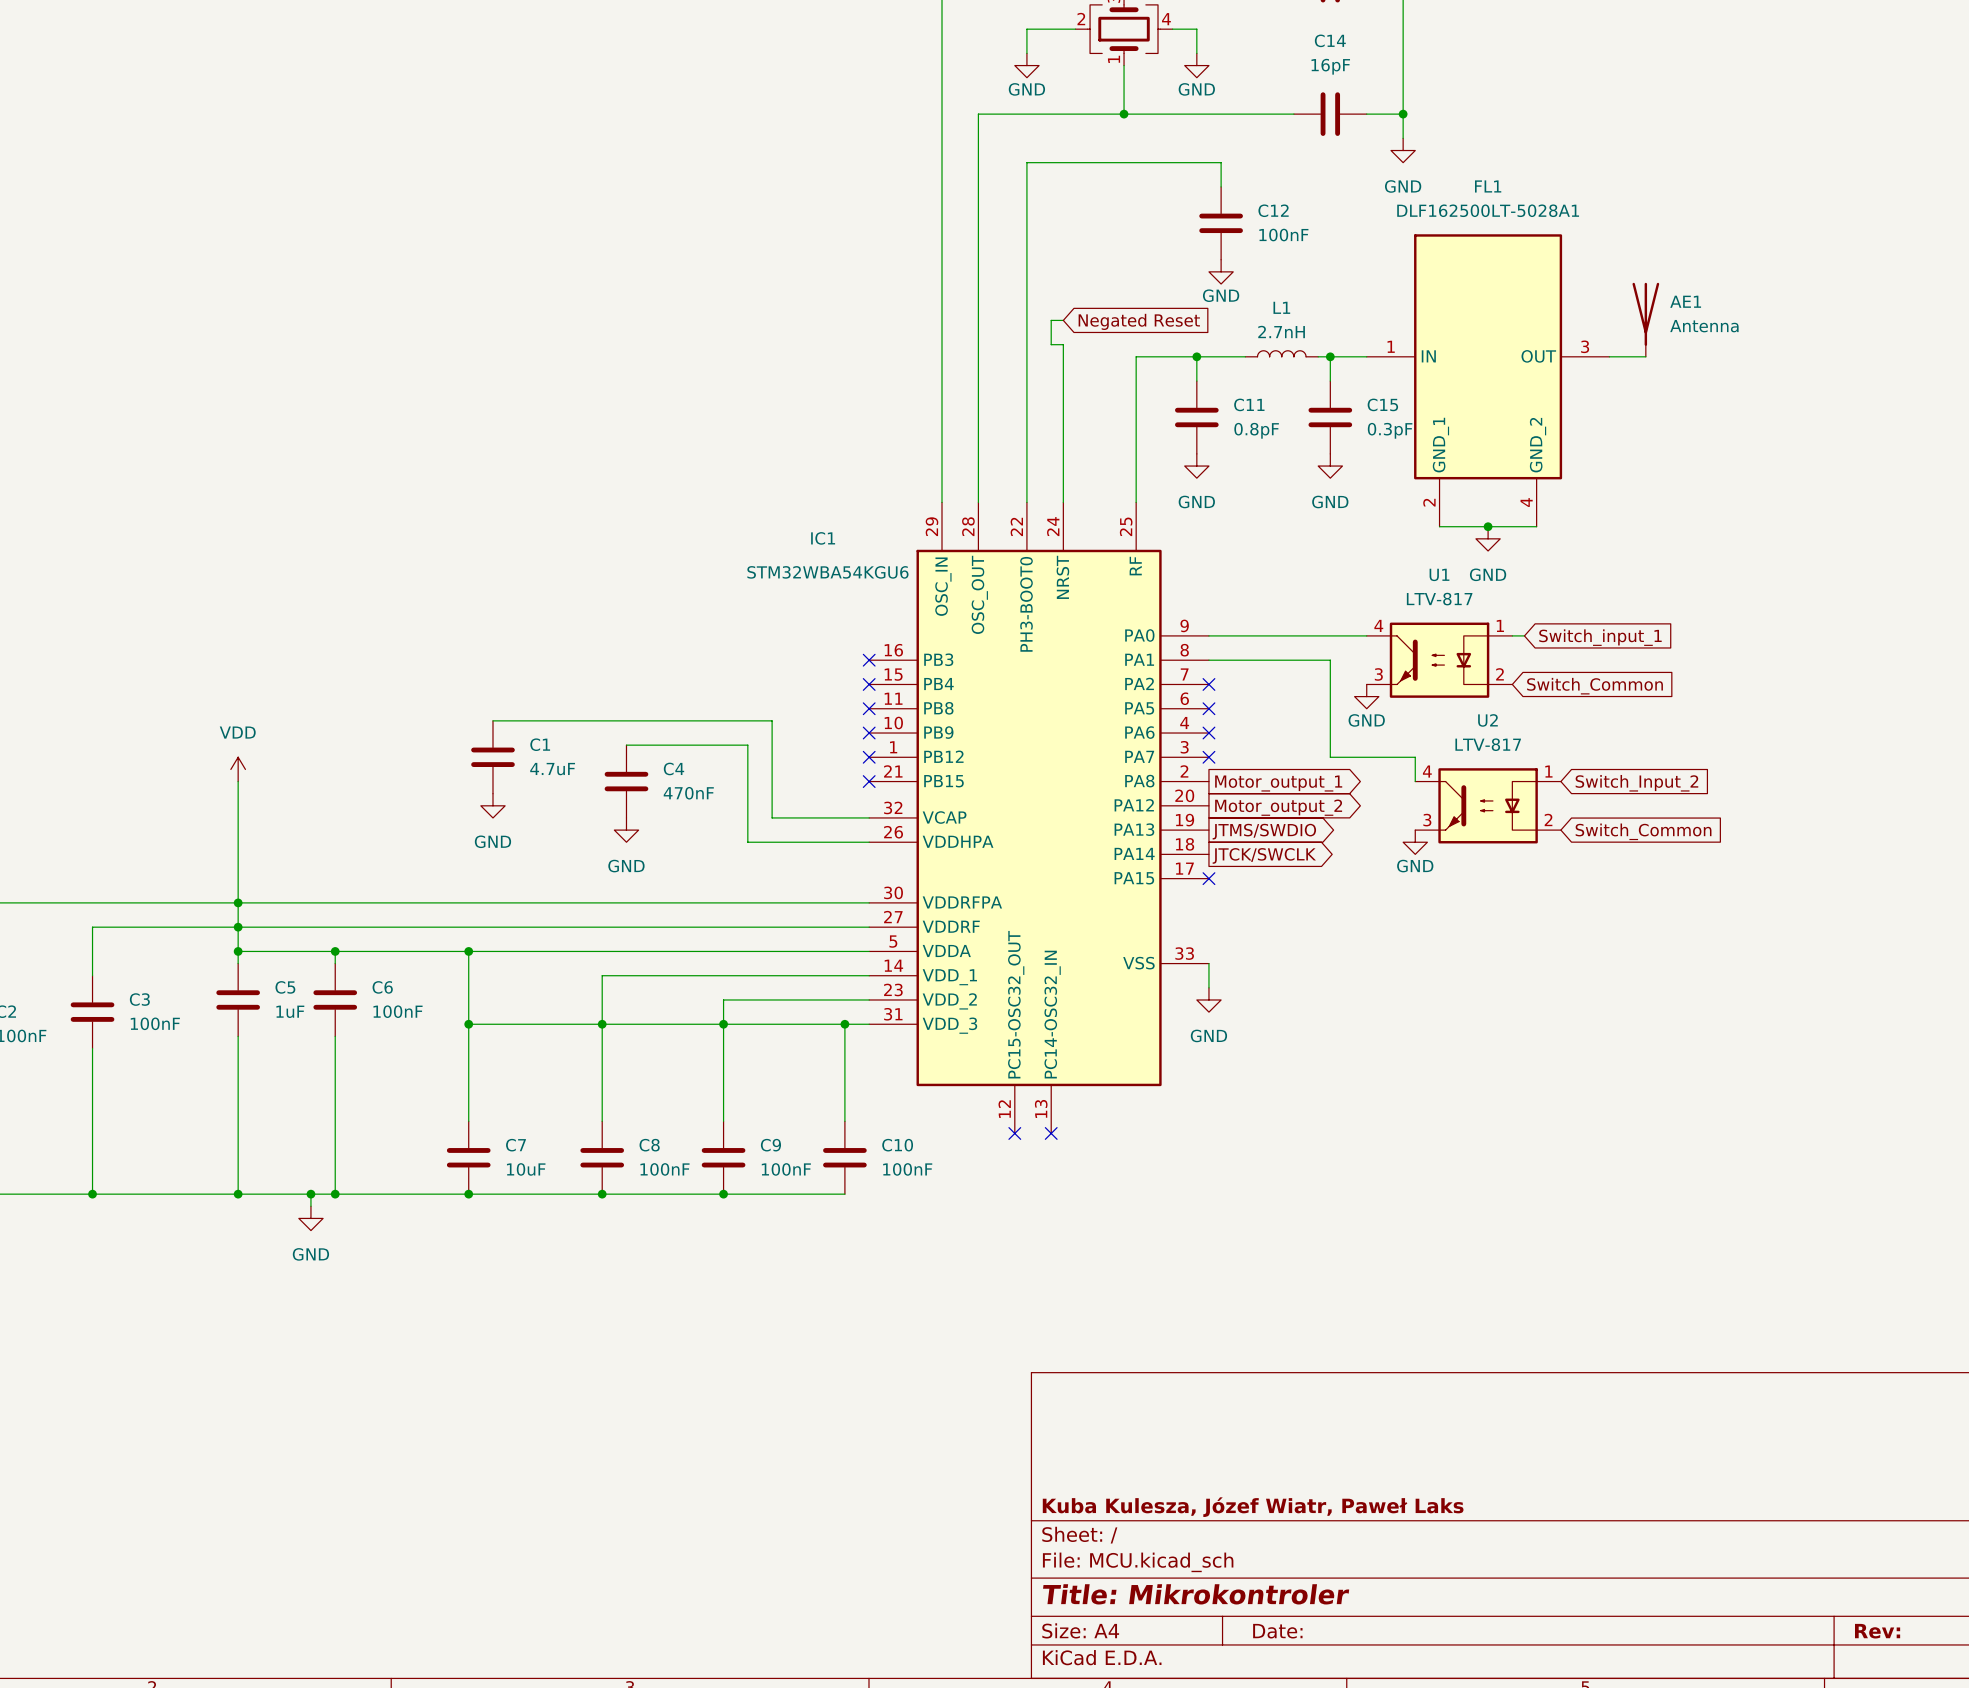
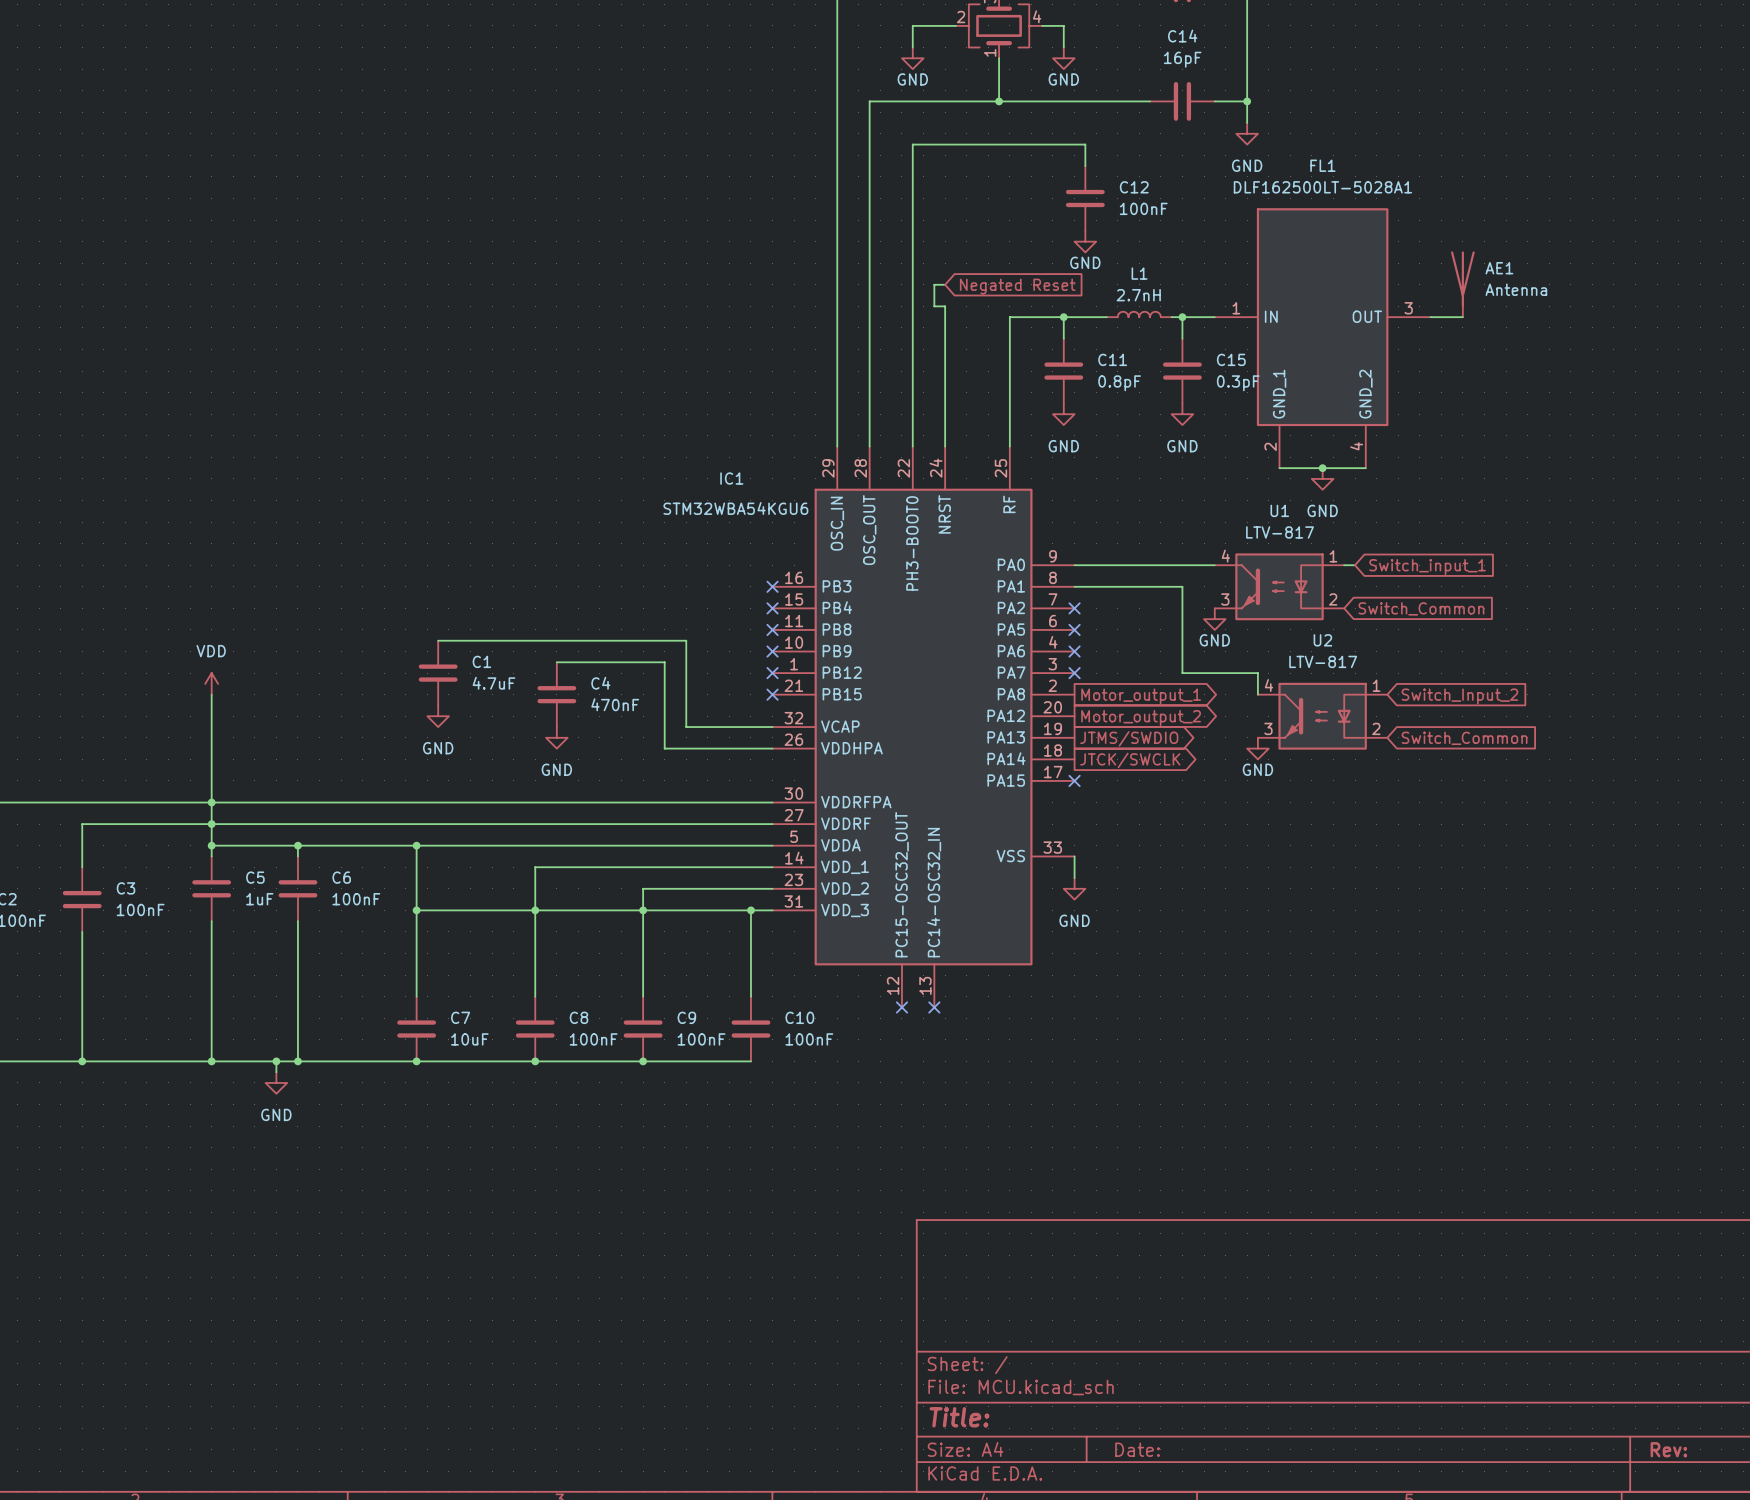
title block: Kuba Kulesza, Józef Wiatr, Paweł Laks (1253, 1507) -> none
title block: Title: Mikrokontroler (1196, 1594) -> Title: (959, 1417)

